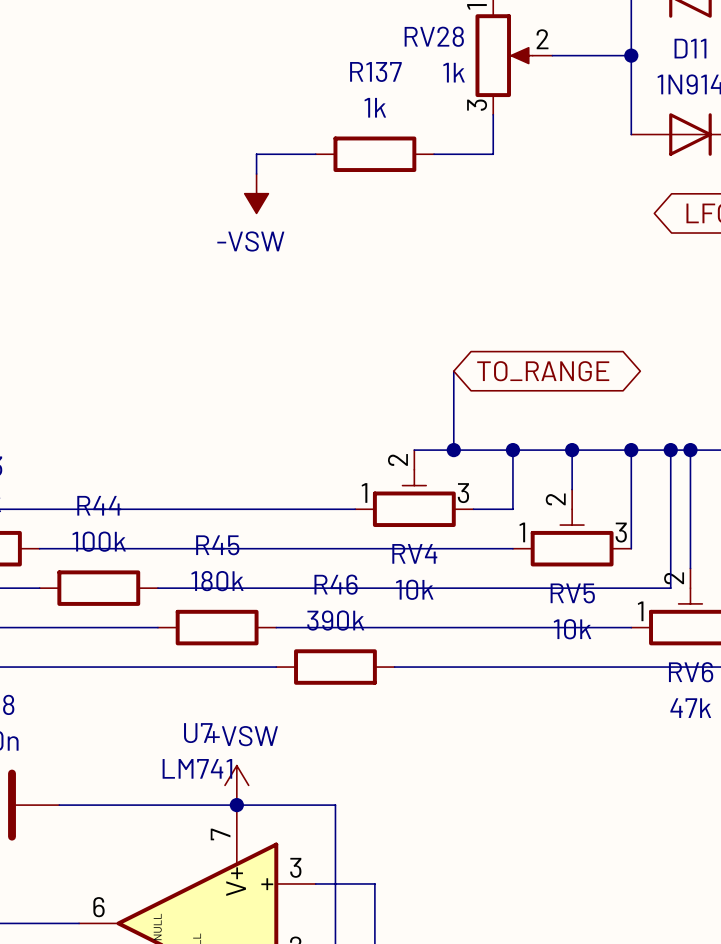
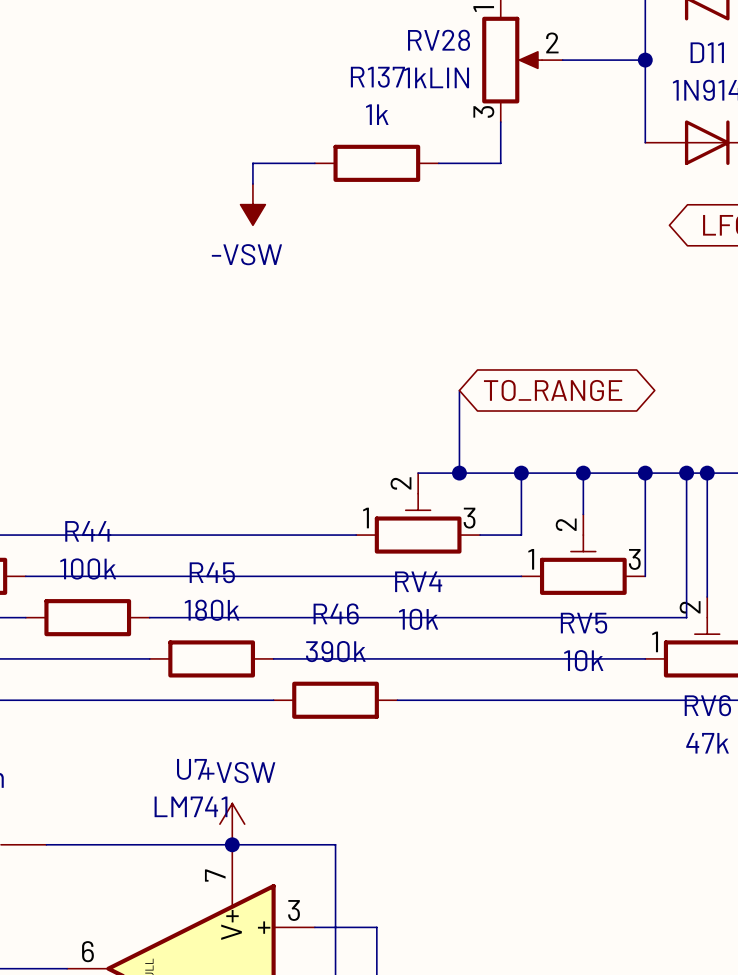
RV28 value: 1k (454, 72) -> 1kLIN (436, 77)

